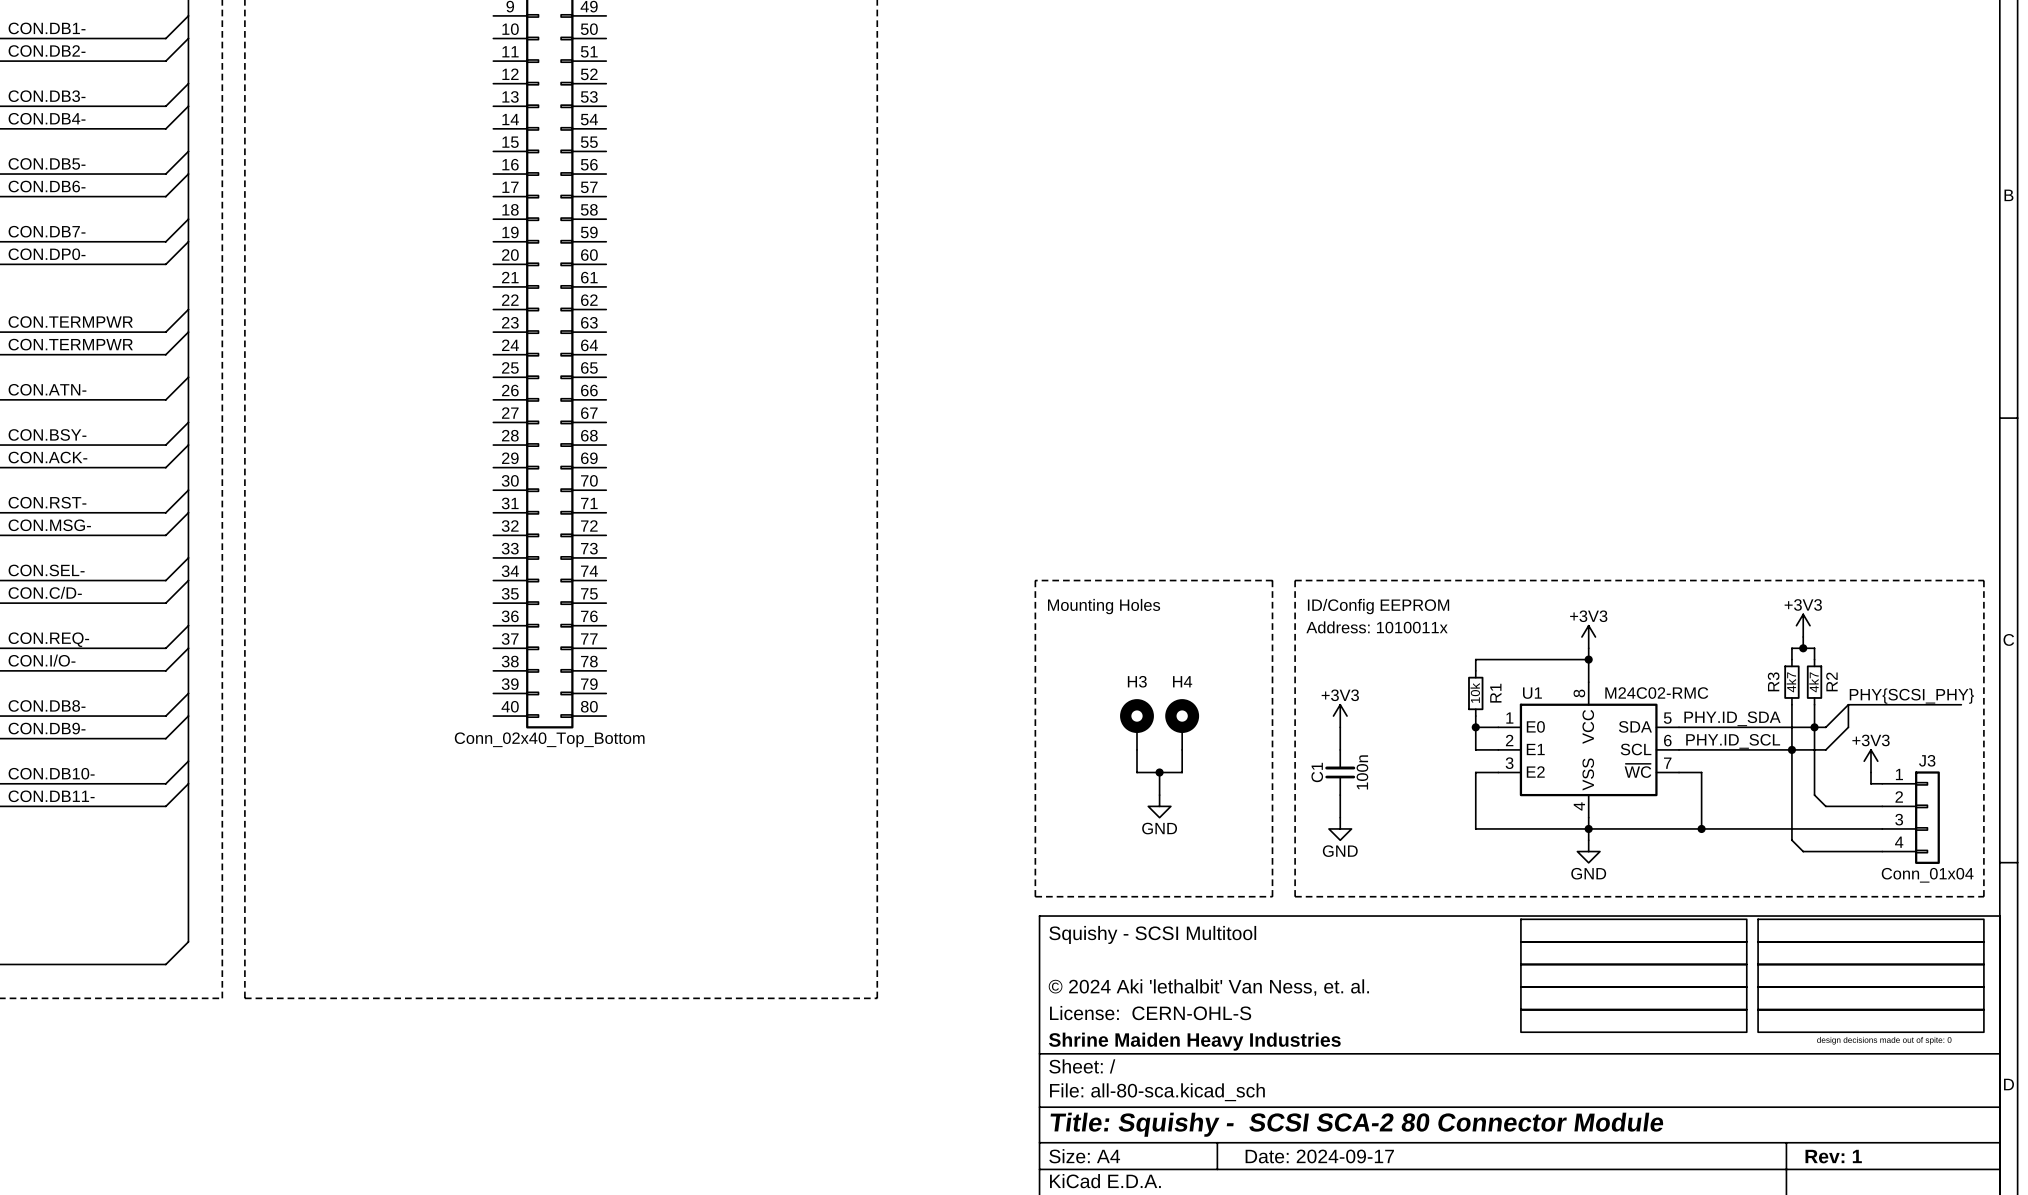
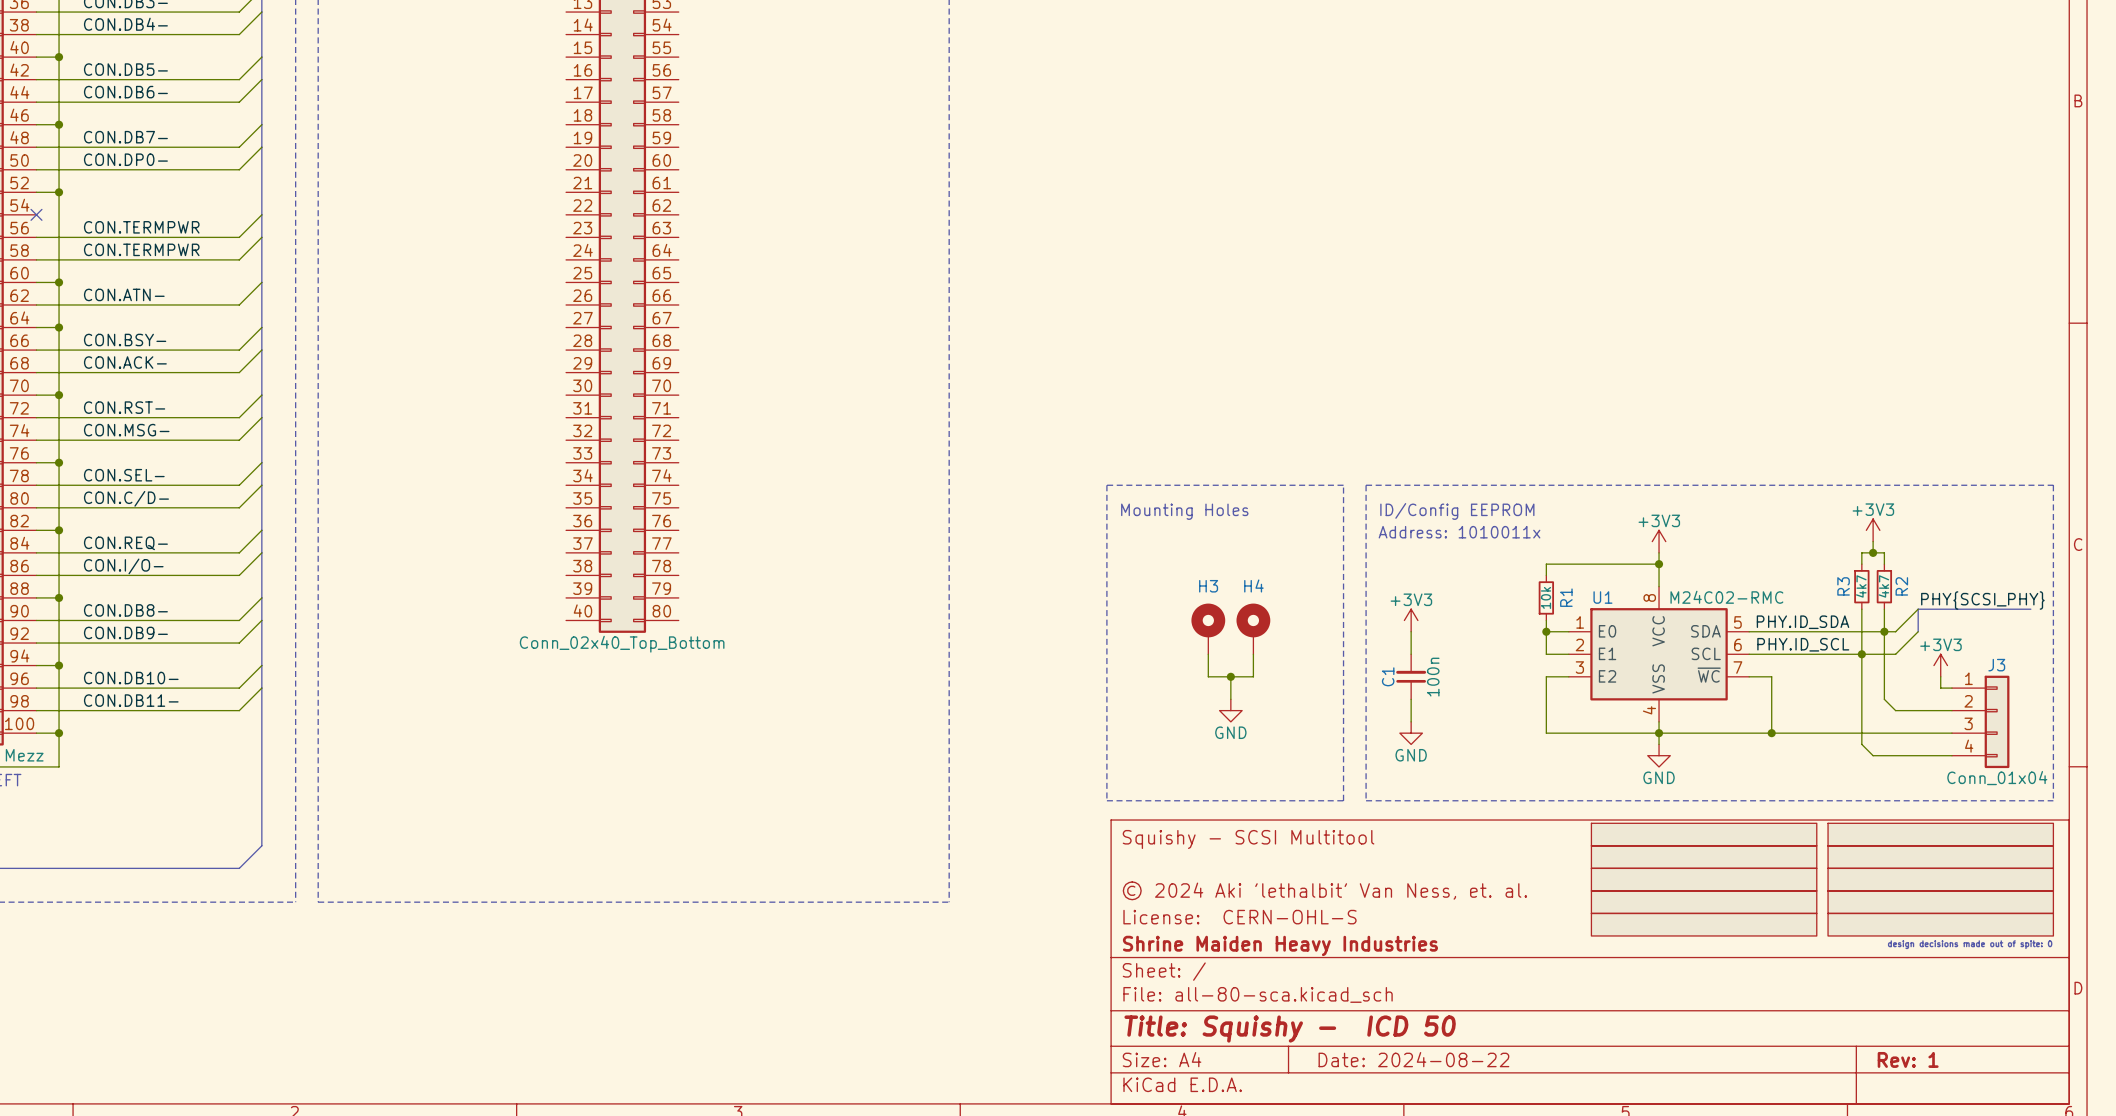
title block: Title: Squishy - SCSI SCA-2 80 Connector Module (1357, 1124) -> Title: Squishy - ICD 50 (1290, 1029)
title block: Date: 2024-09-17 (1319, 1156) -> Date: 2024-08-22 (1413, 1059)

